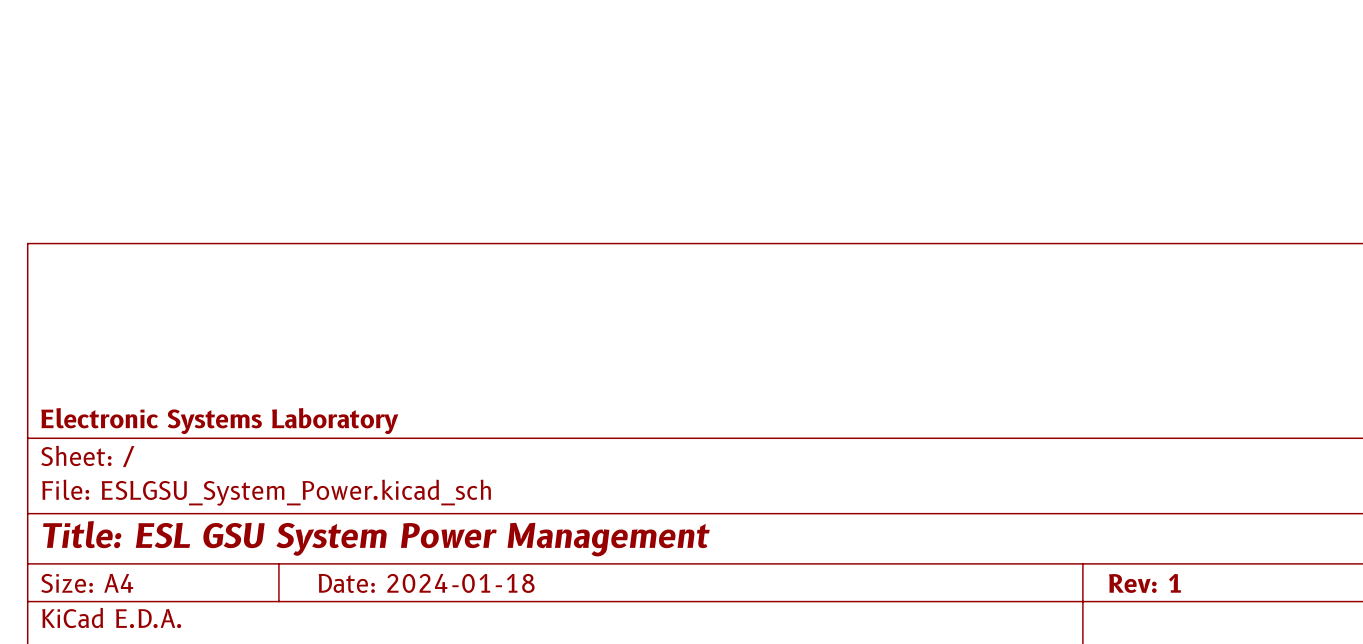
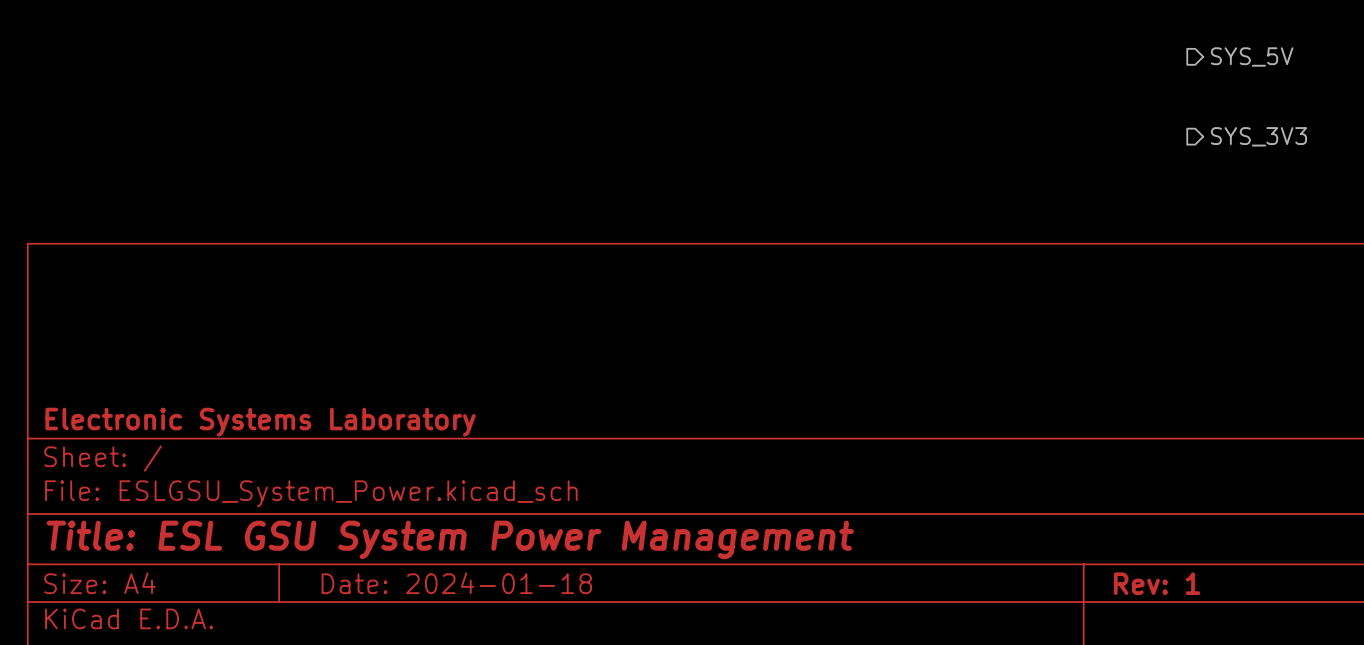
hierarchical label: none -> SYS_5V (1252, 56)
hierarchical label: none -> SYS_3V3 (1258, 136)

